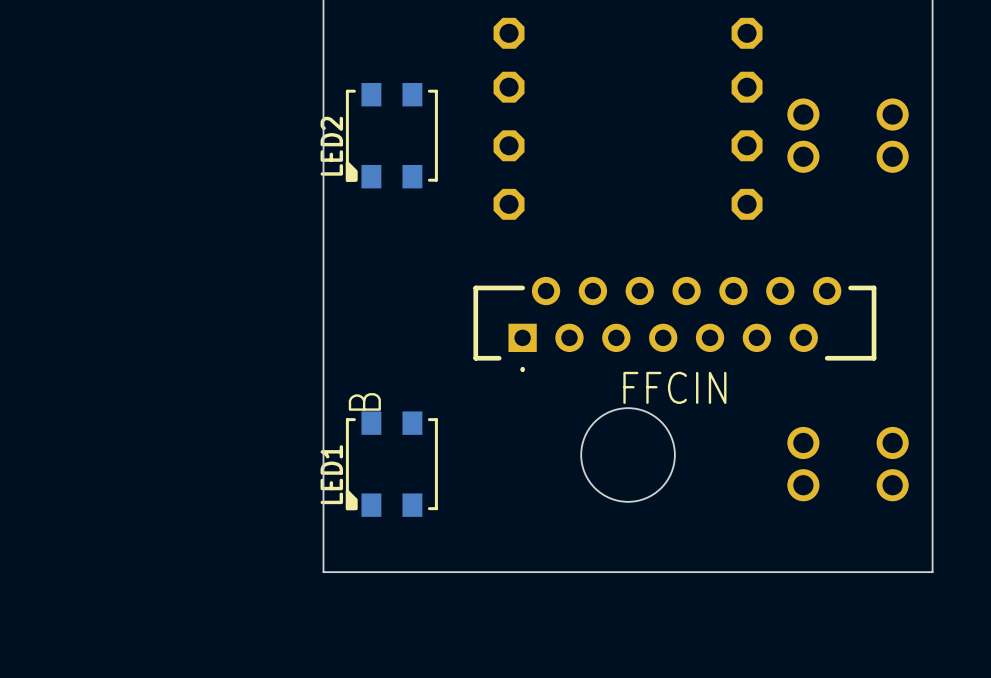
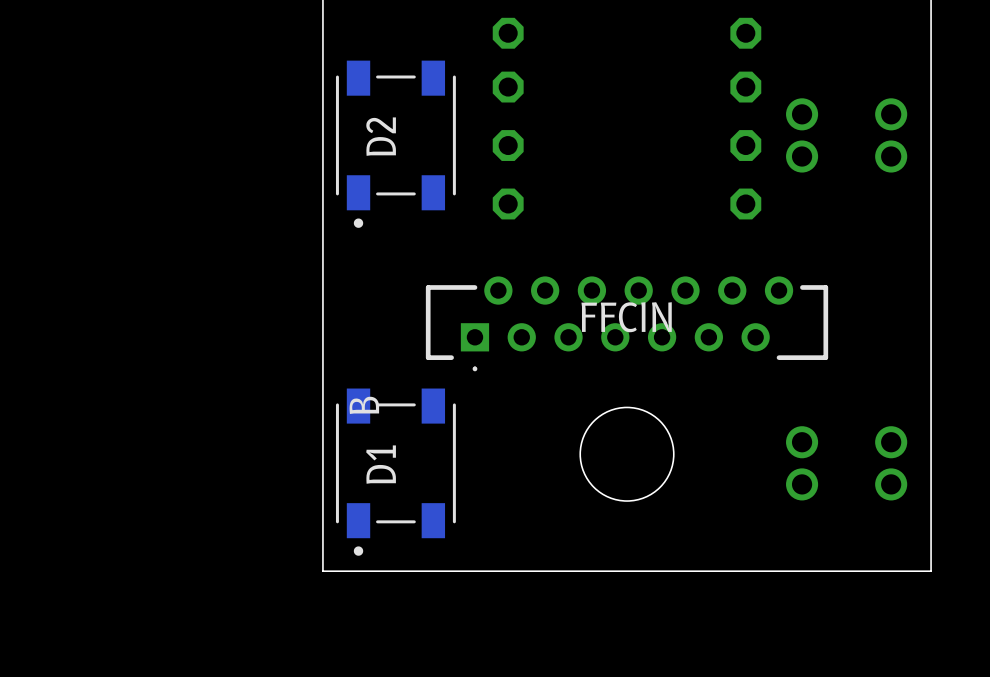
LED2: (391, 135) -> none
D2: none -> (395, 144)
FFCIN position: (674, 324) -> (627, 323)
FFCIN name position: FFCIN (674, 387) -> FFCIN (626, 317)
LED1: (391, 464) -> none
D1: none -> (395, 472)

